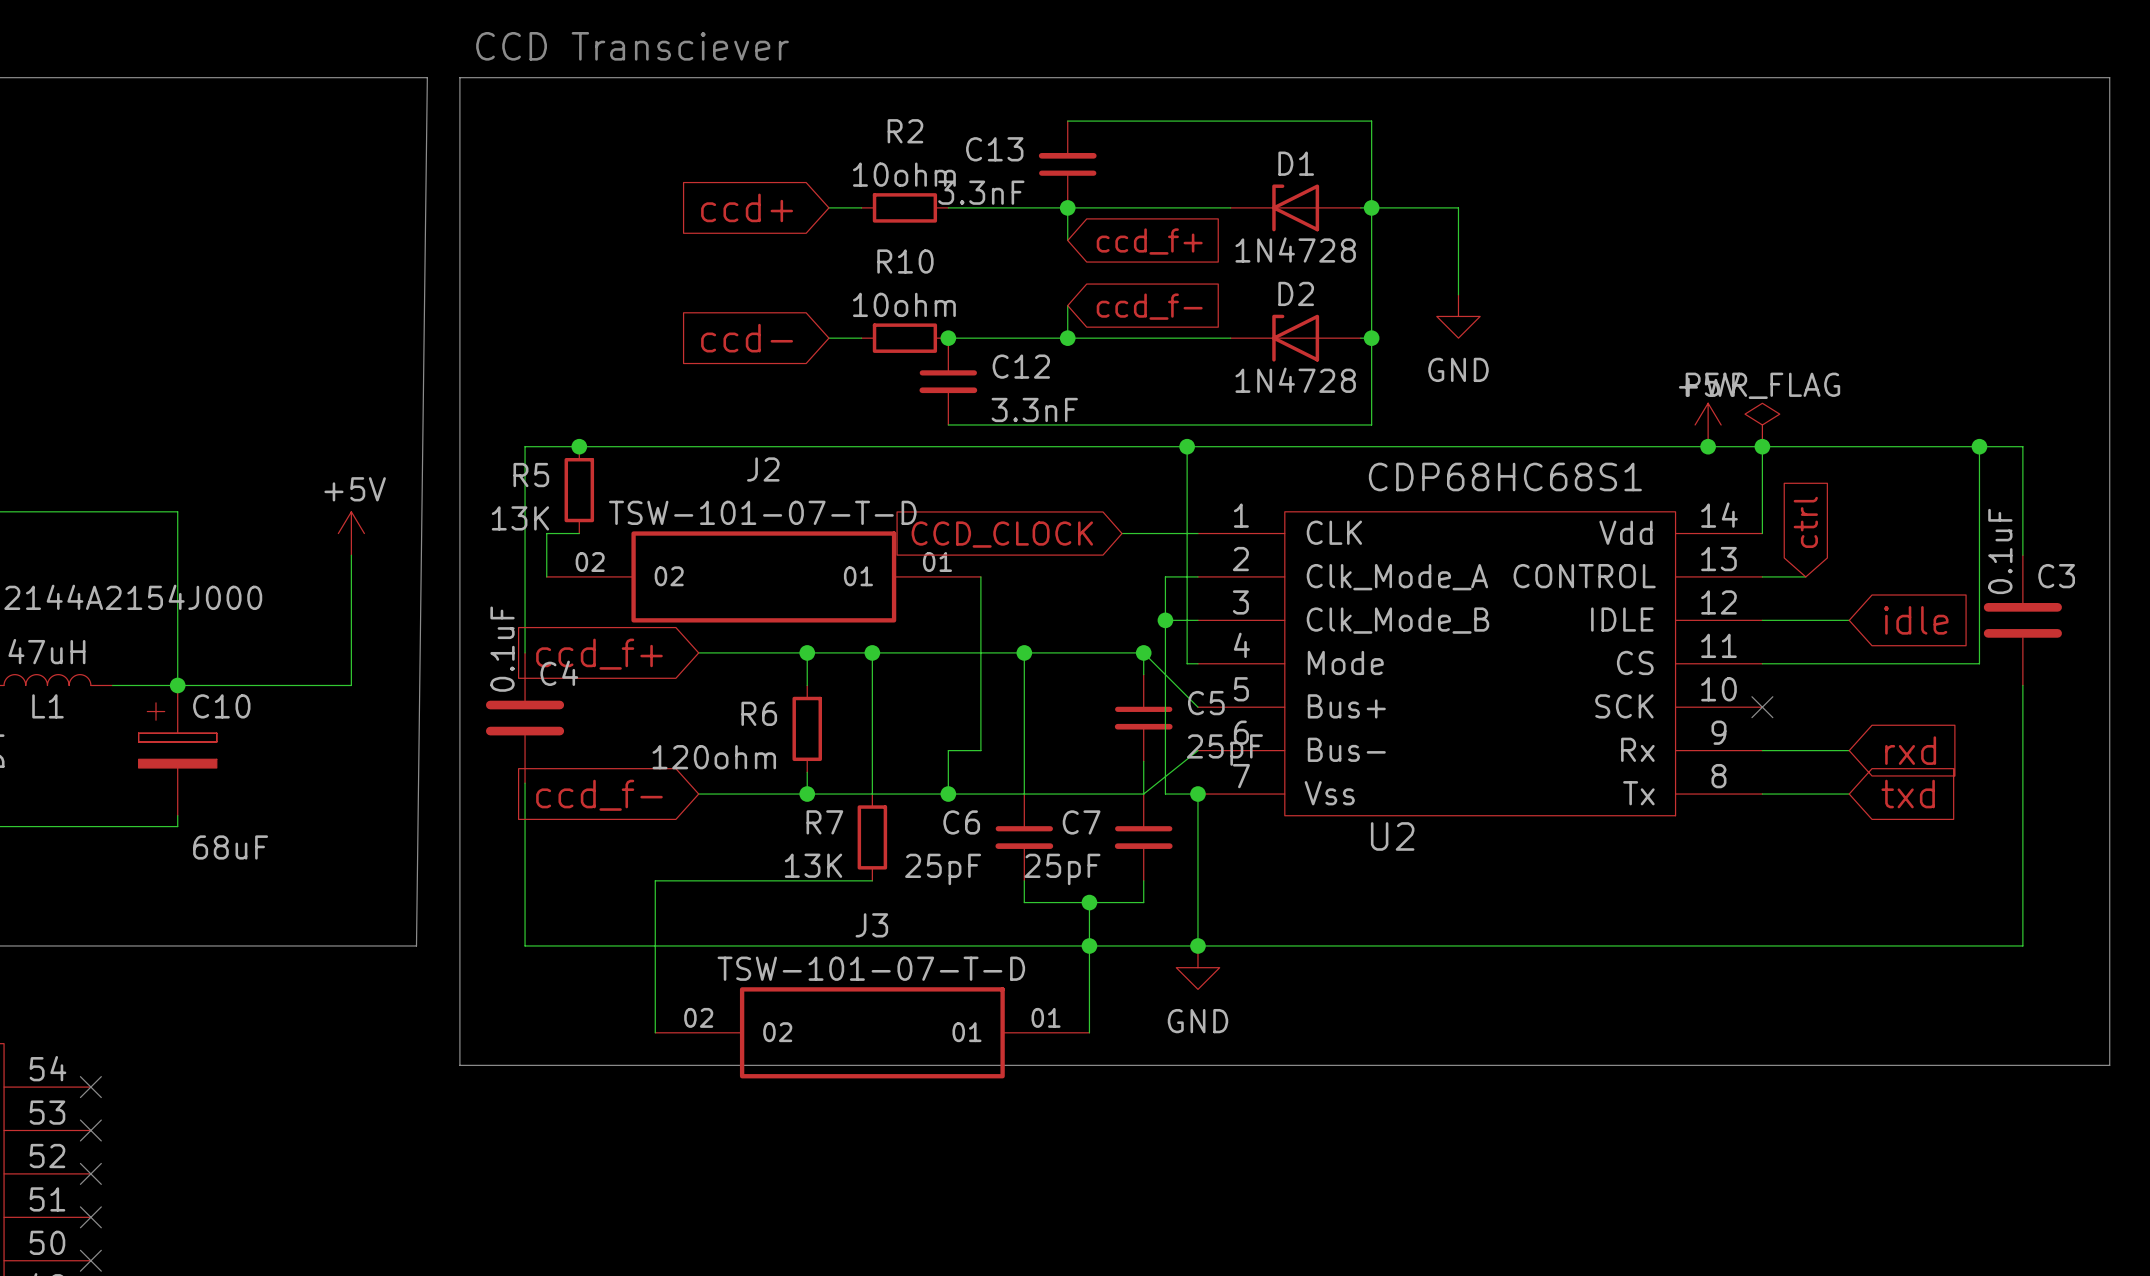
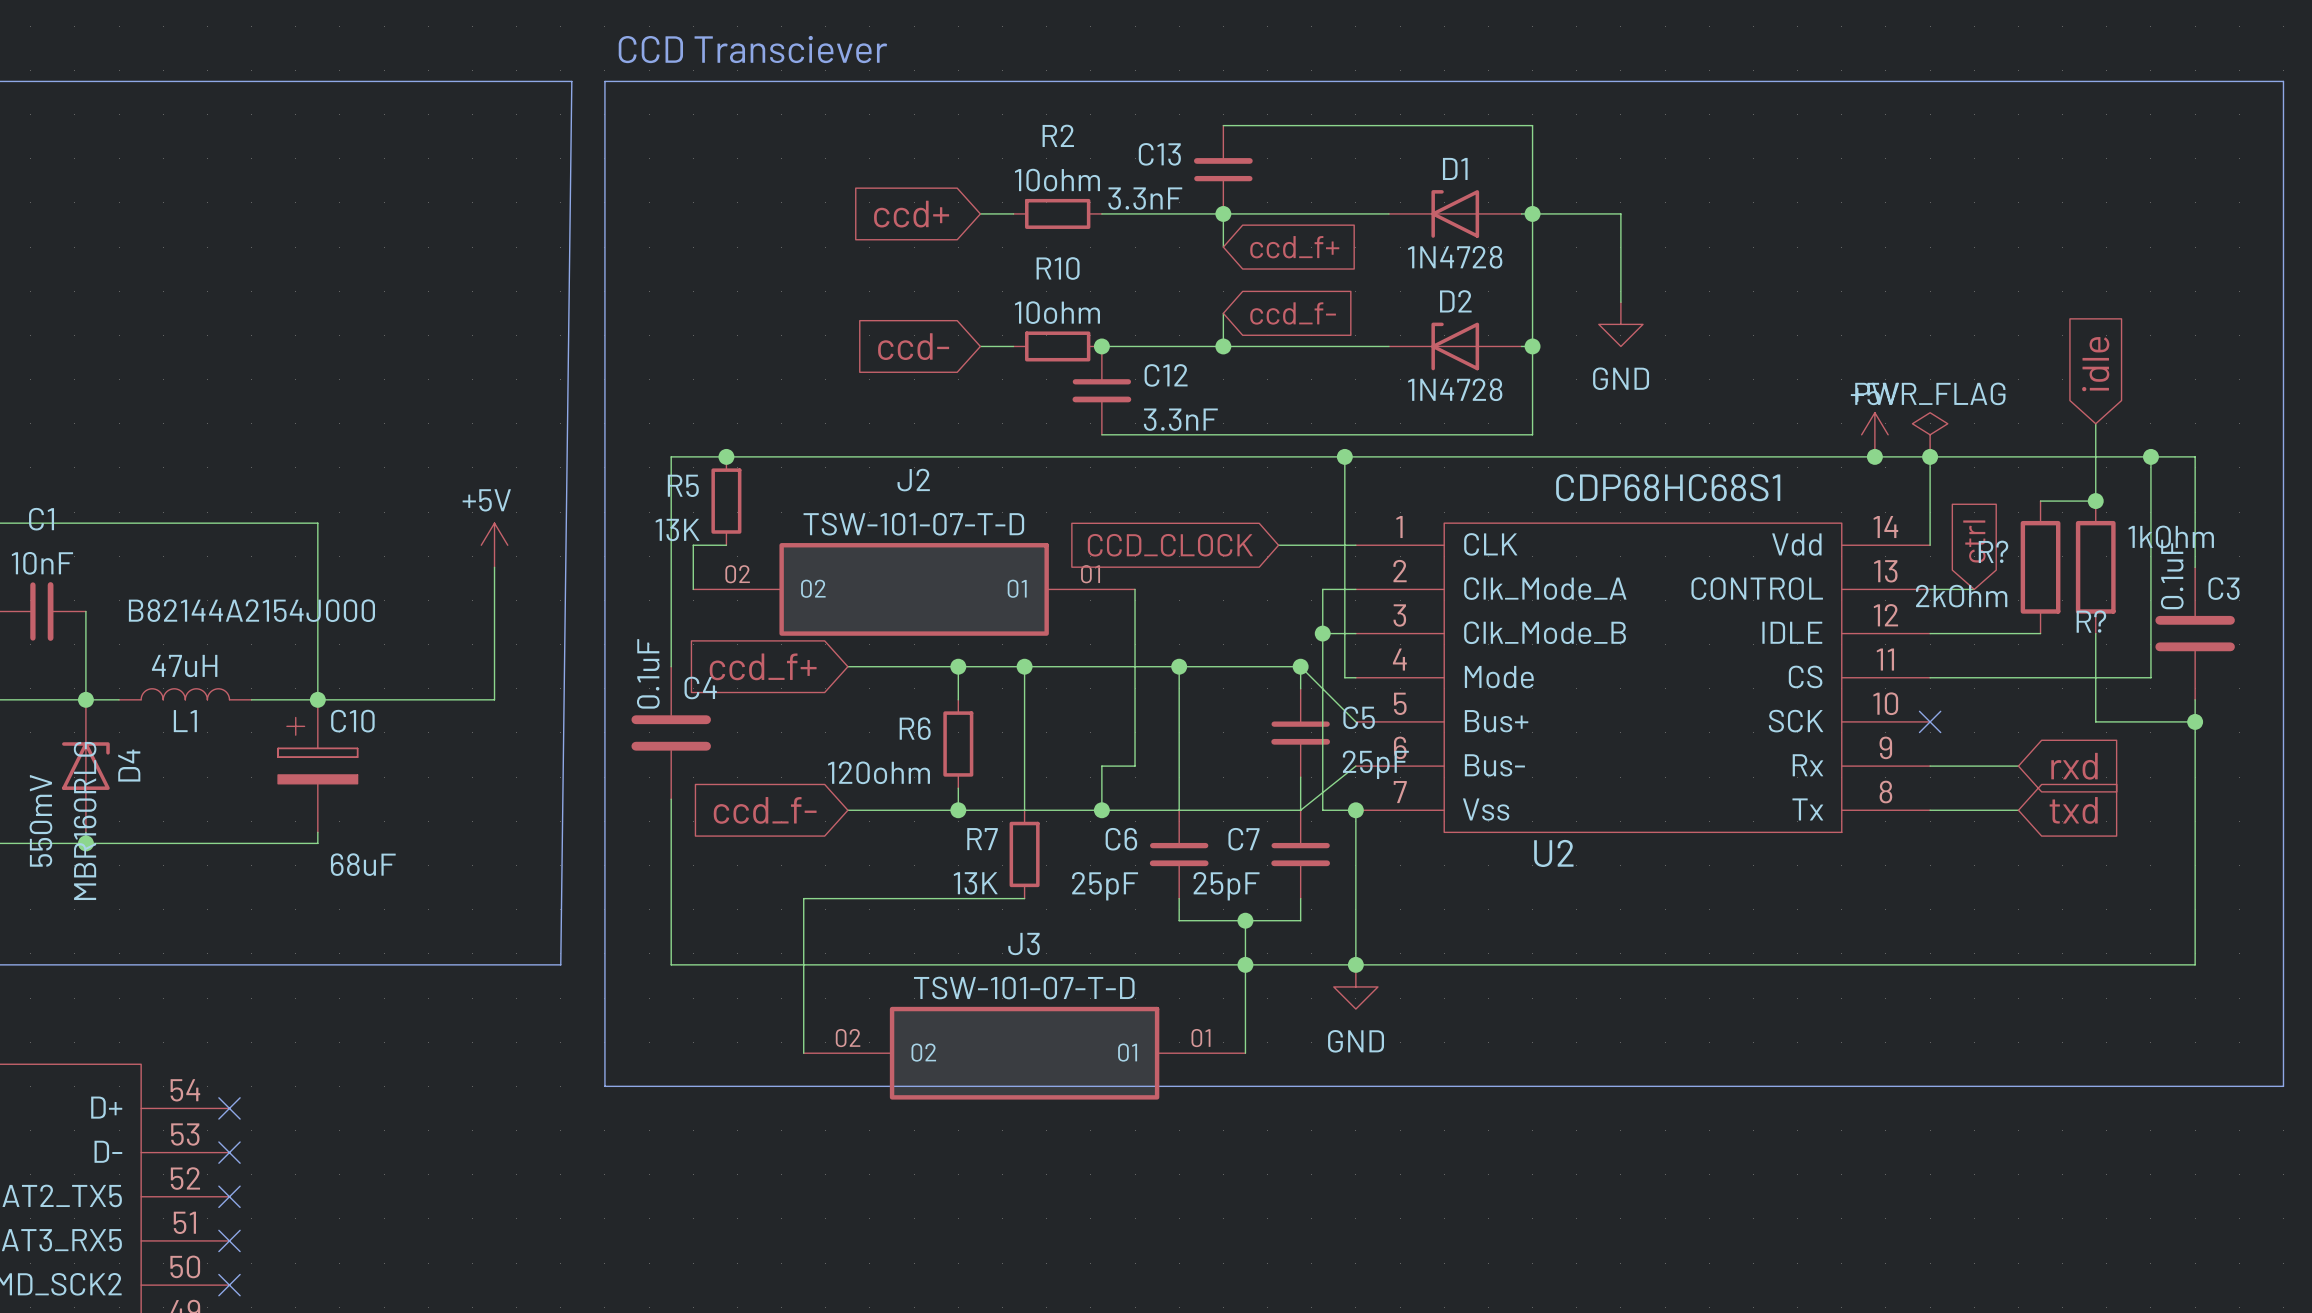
wire: none -> (2095, 423) (2095, 501) (2040, 501)
junction: none -> (2095, 501)
R?: none -> 2kOhm (2040, 567)
R?: none -> 1kOhm (2095, 567)
wire: none -> (2018, 633) (2040, 633)
global label rotation: 0° (1916, 620) -> 90° counterclockwise (2095, 364)
global label position: idle (1916, 620) -> idle (2095, 364)
wire: none -> (2095, 633) (2095, 721) (2195, 721)
junction: none -> (2195, 721)

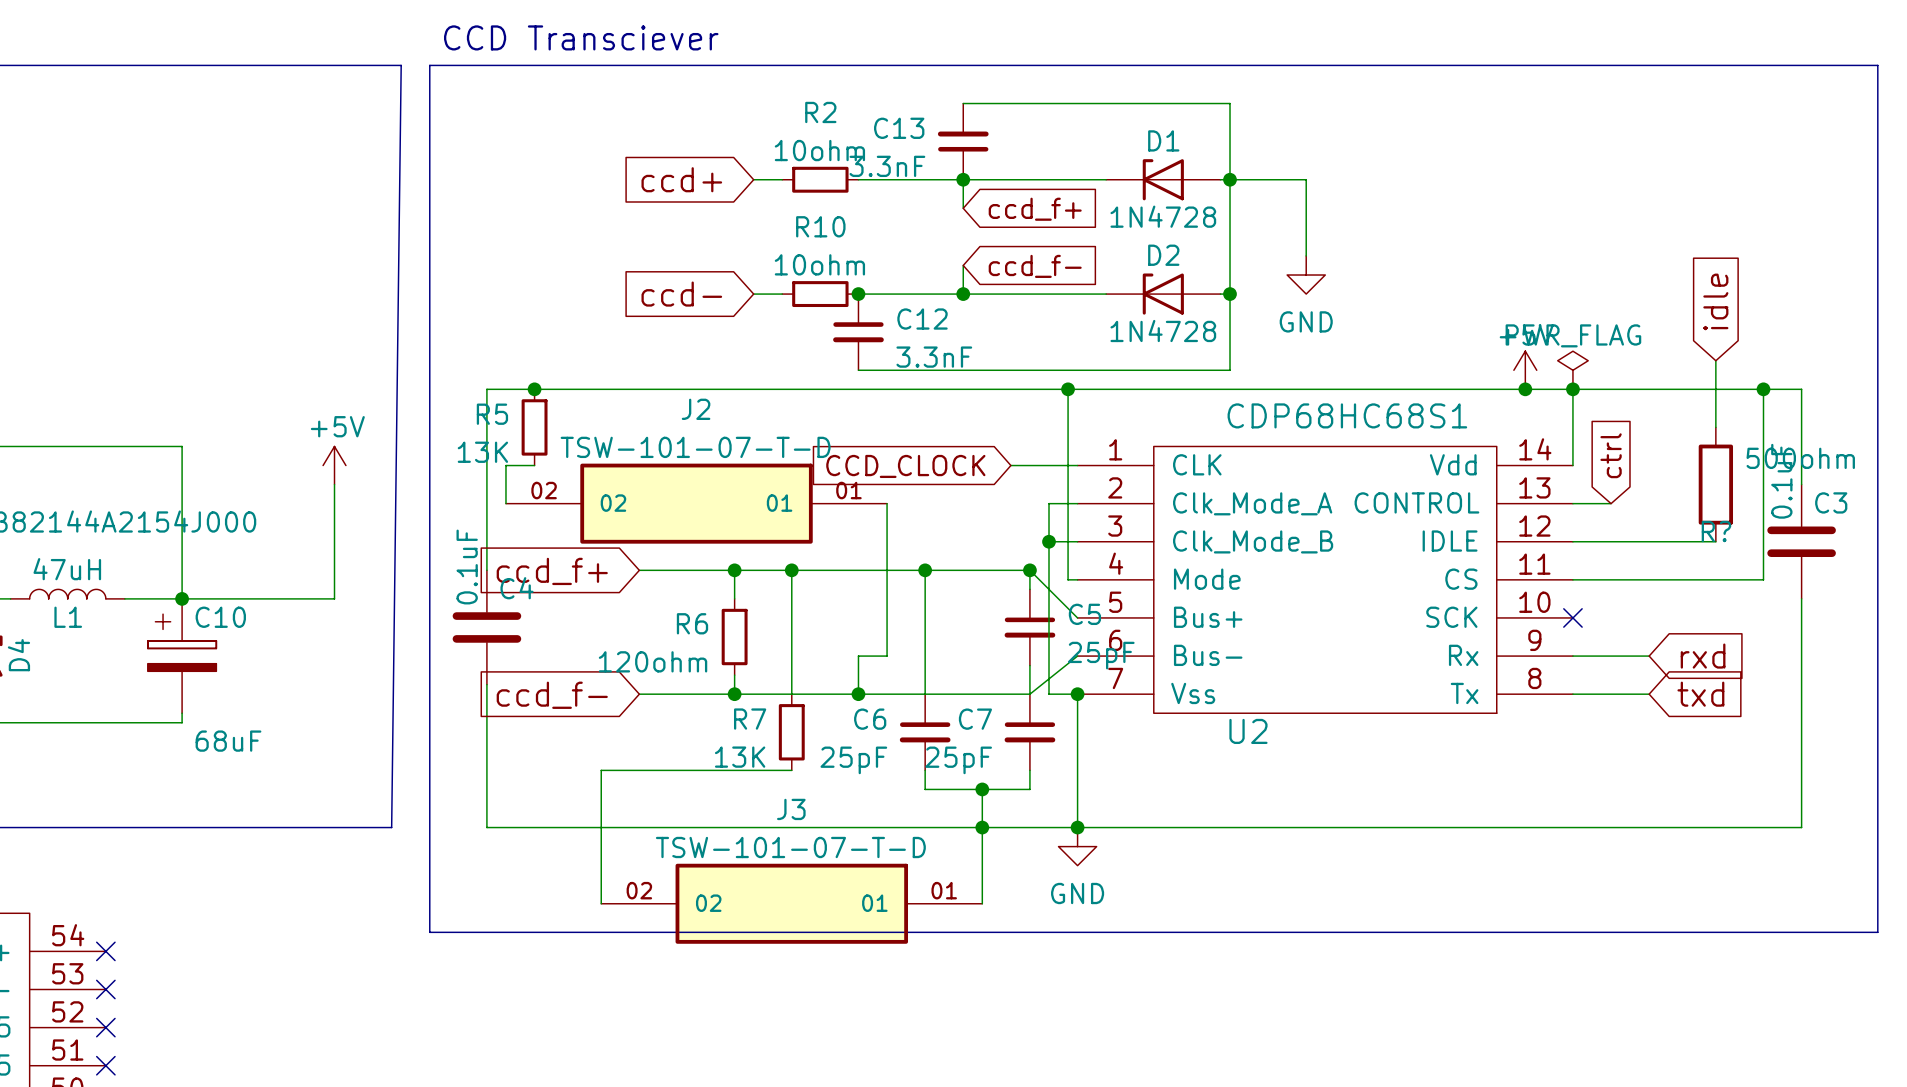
wire: (2040, 501) (2095, 501) -> none
junction: (2095, 501) -> none
R? value: 1kOhm (2171, 536) -> 500ohm (1800, 458)
R?: 2kOhm (2040, 567) -> none
wire: (2095, 633) (2095, 721) (2195, 721) -> (1715, 541) (1668, 541)
junction: (2195, 721) -> none

